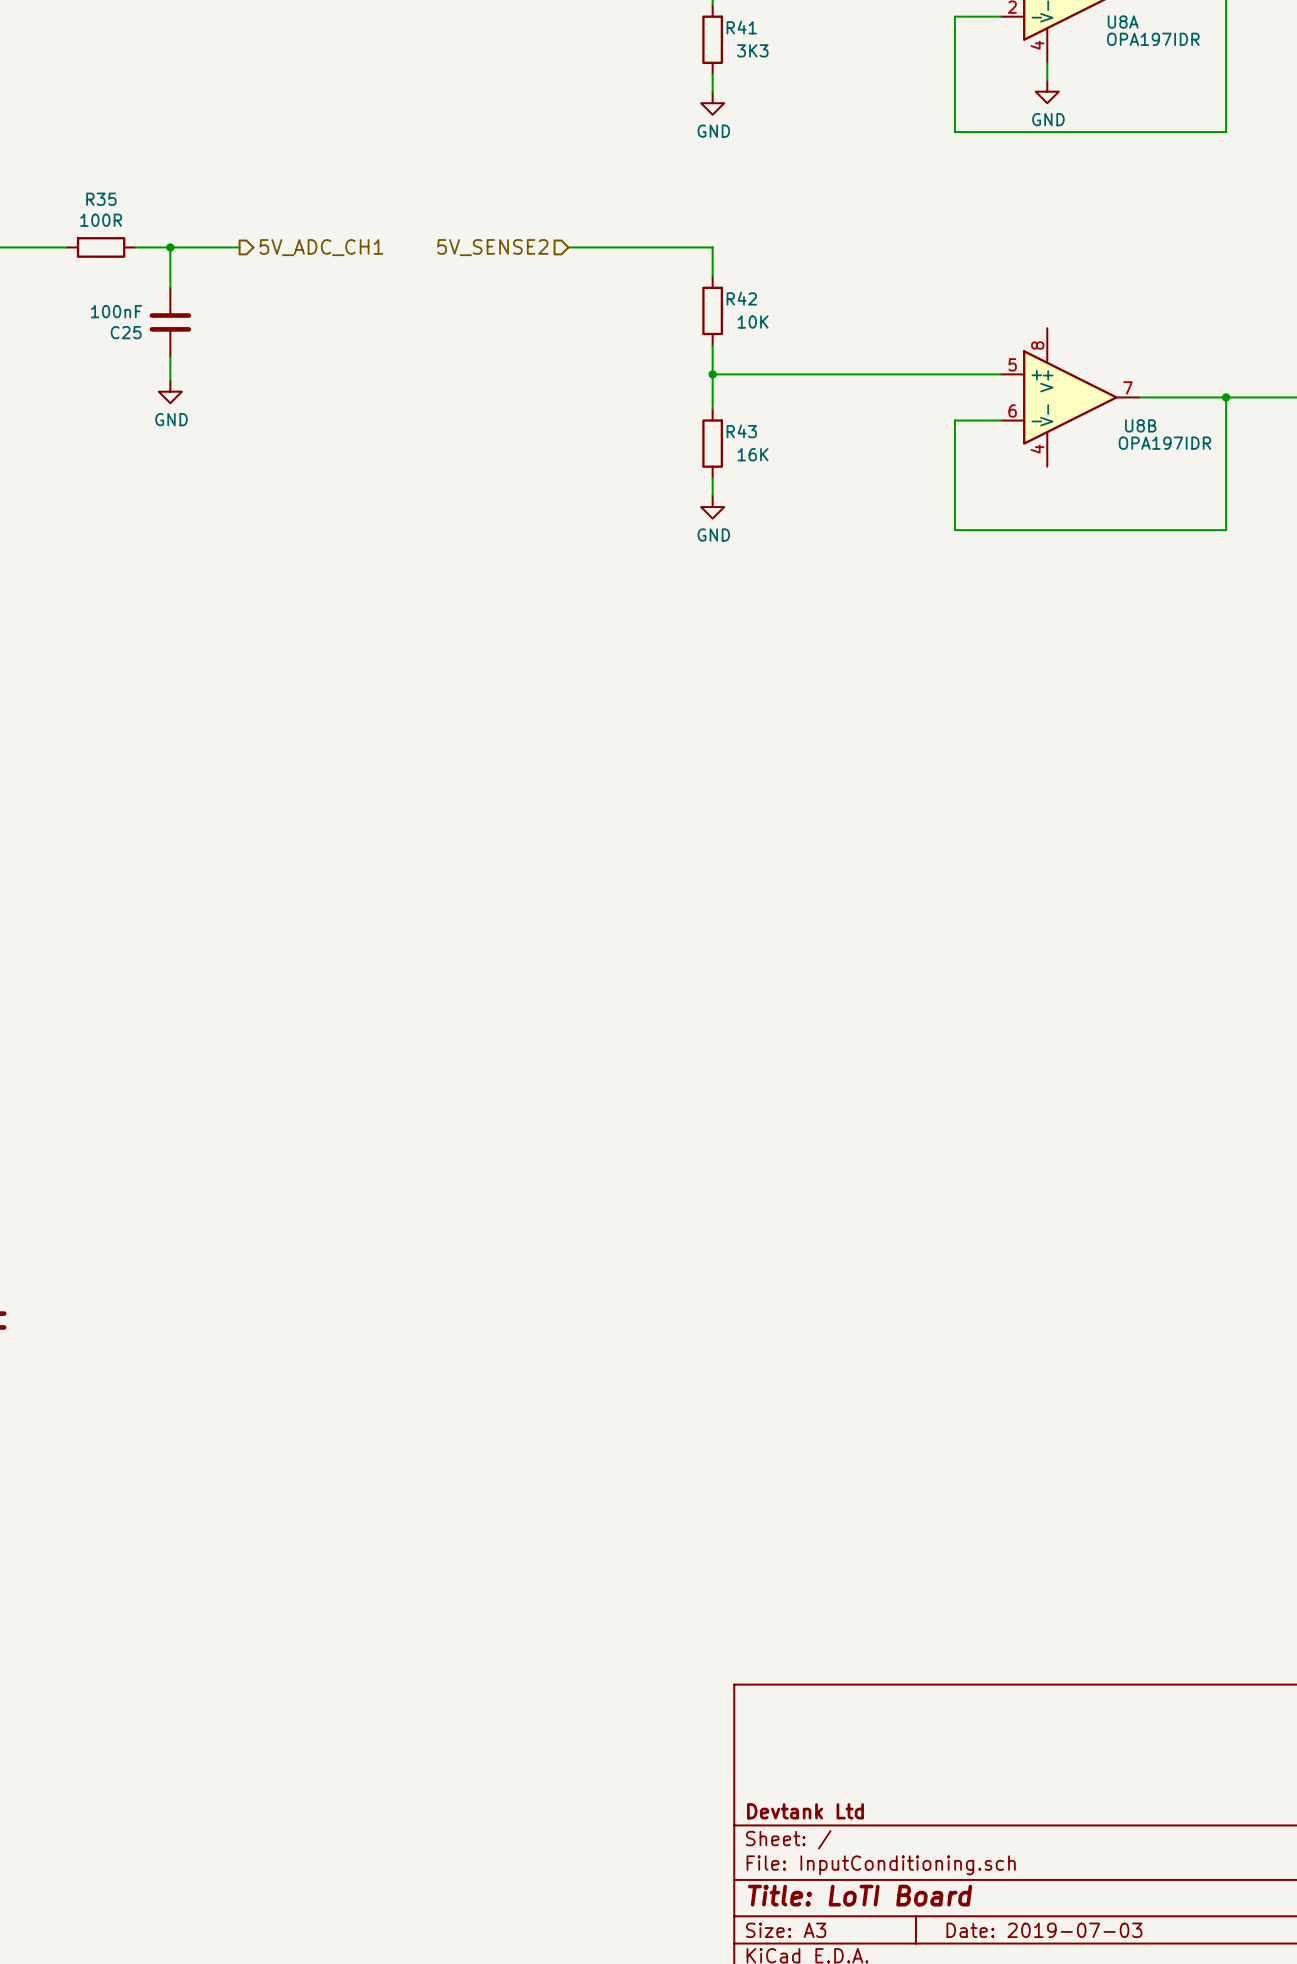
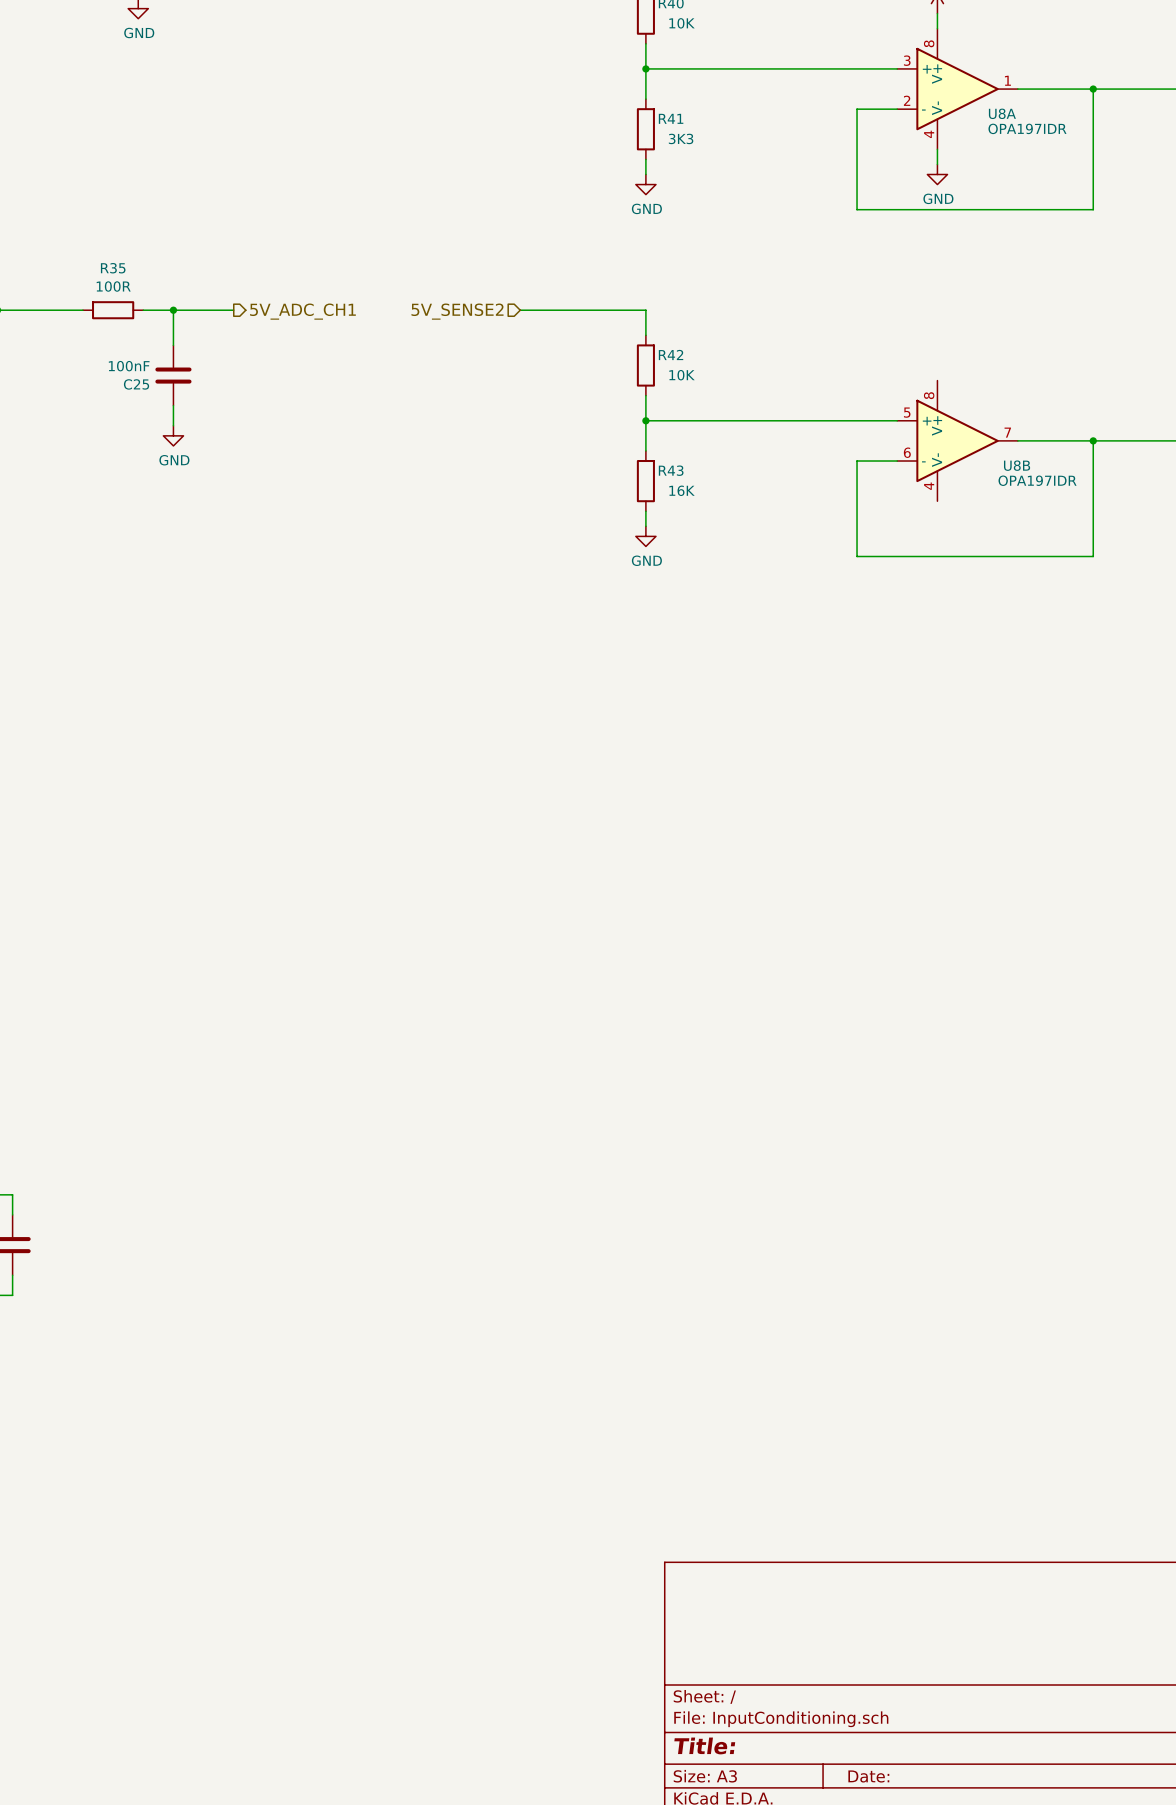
title block: Devtank Ltd (805, 1811) -> none
title block: Title: LoTI Board (860, 1895) -> Title: (704, 1745)
title block: Date: 2019-07-03 (1044, 1930) -> Date: (868, 1776)

